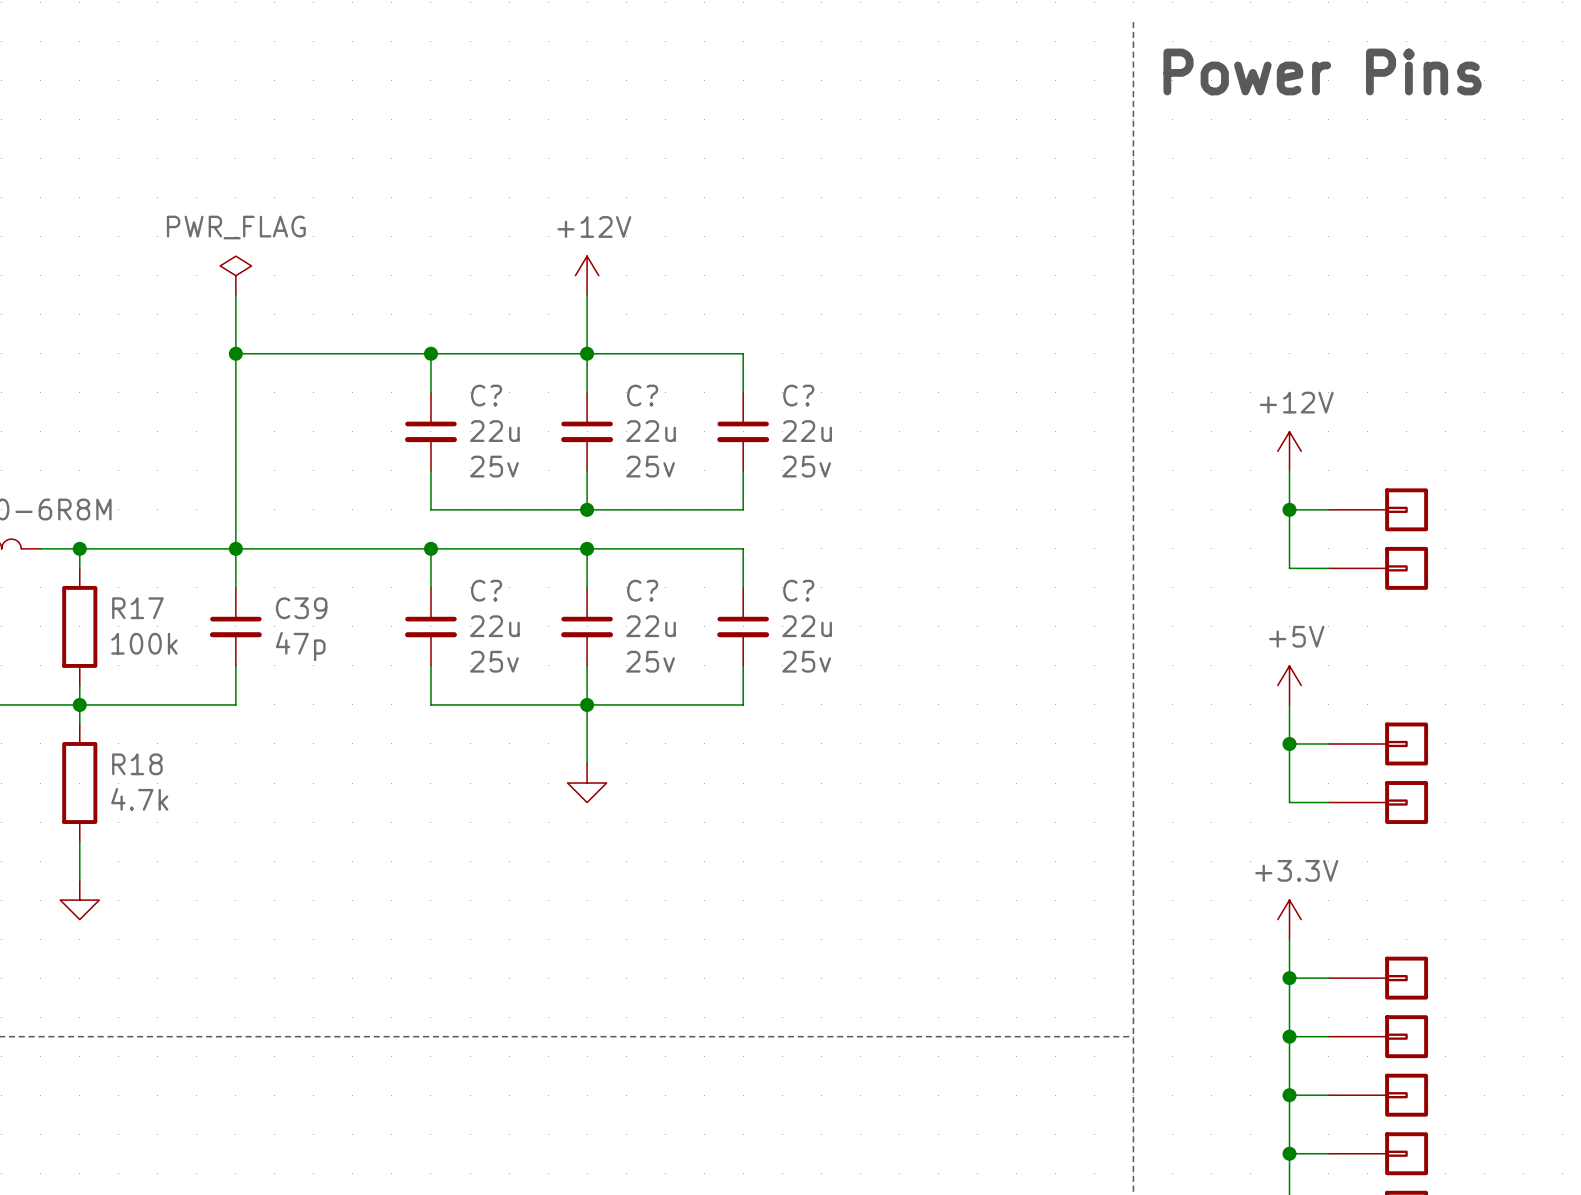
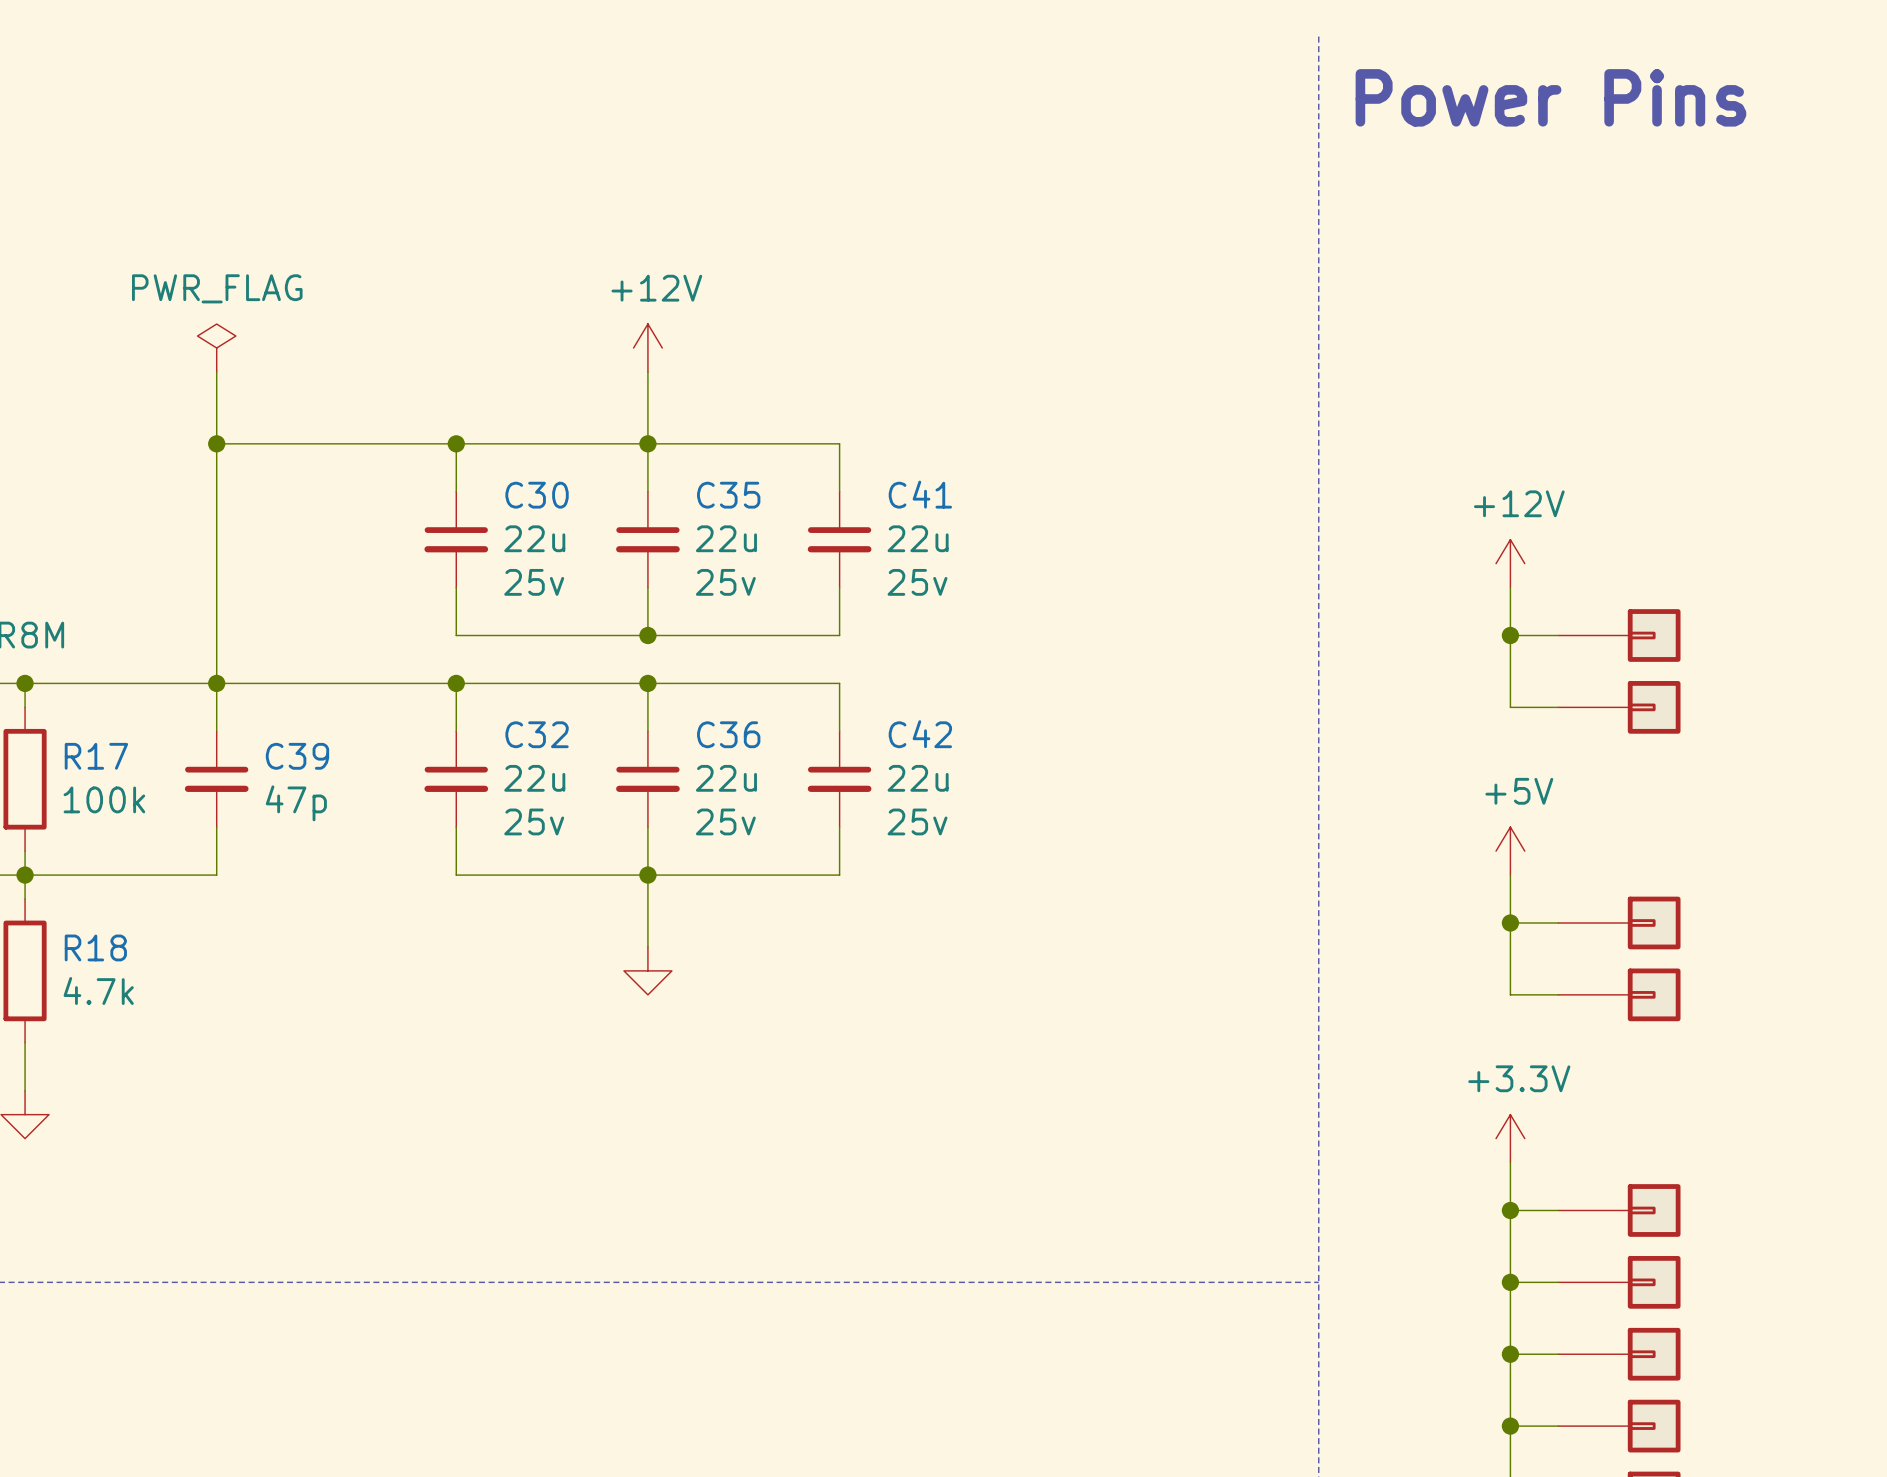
C? name: C? (486, 395) -> C30 (537, 495)
C? name: C? (642, 395) -> C35 (728, 495)
C? name: C? (798, 395) -> C41 (920, 494)
C? name: C? (486, 590) -> C32 (537, 734)
C? name: C? (642, 590) -> C36 (728, 734)
C? name: C? (798, 590) -> C42 (920, 734)

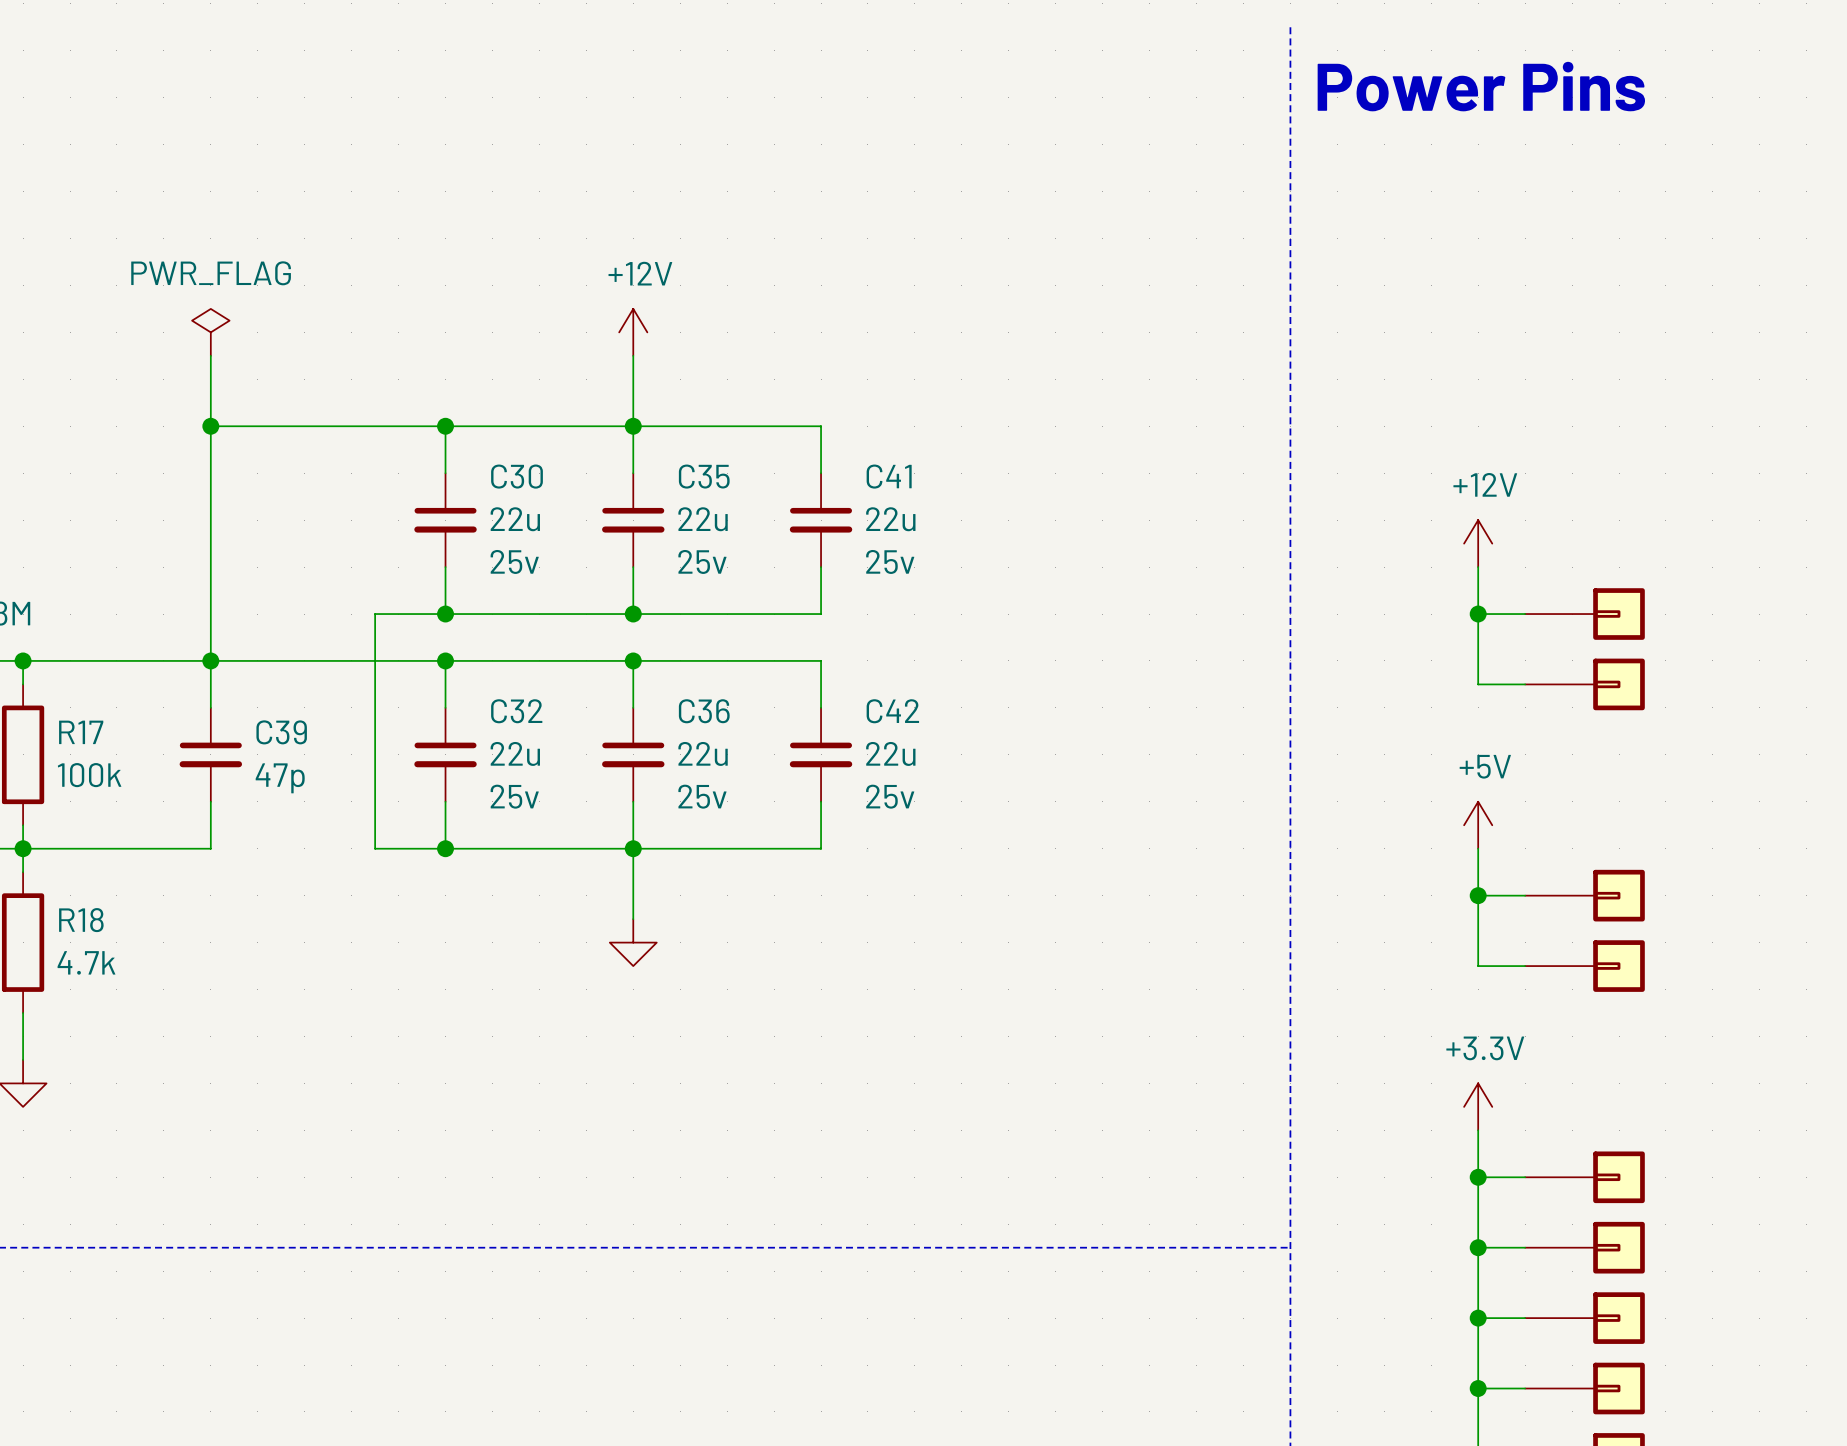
wire: none -> (445, 614) (375, 614) (375, 848) (445, 848)
junction: none -> (445, 614)
junction: none -> (445, 848)

